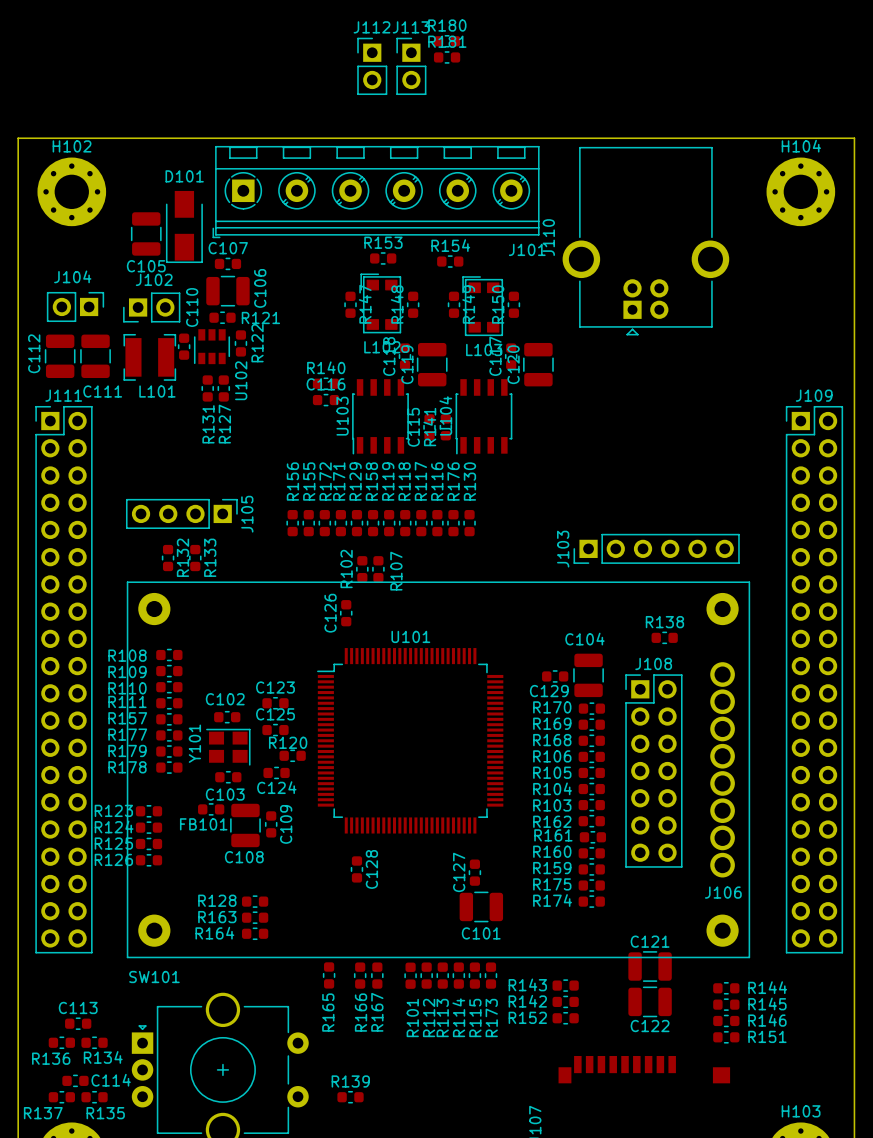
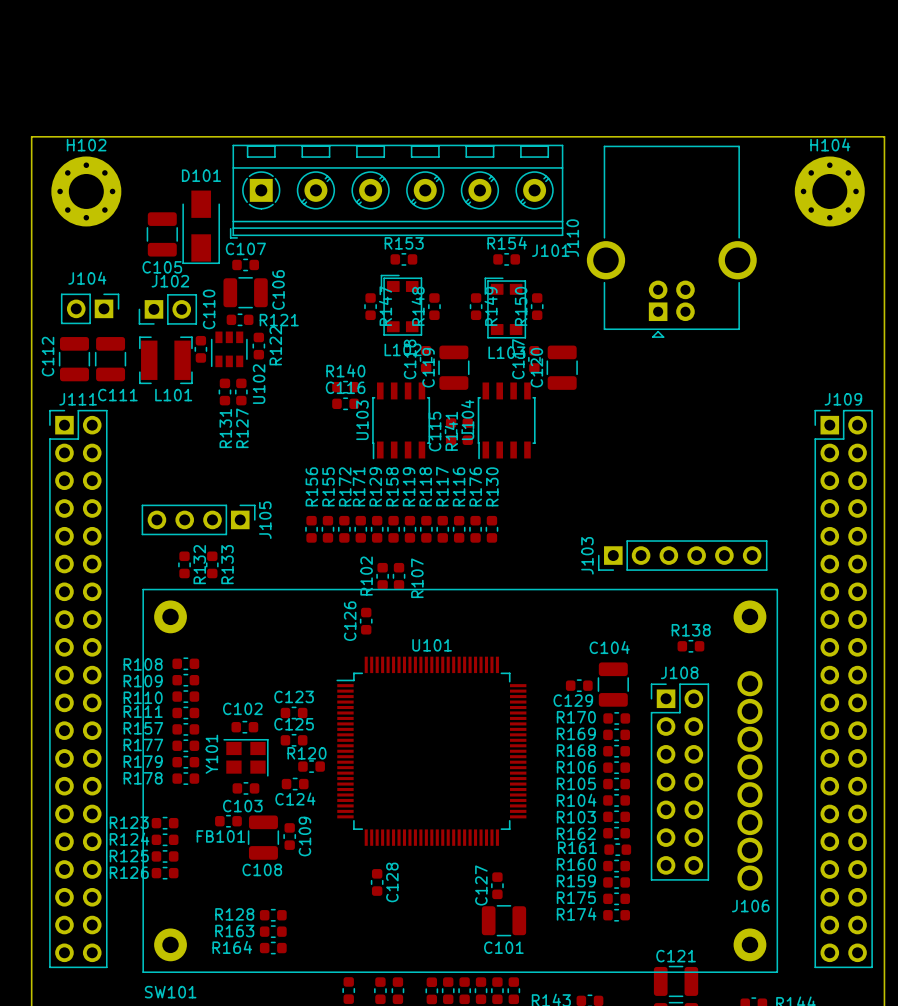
R180: (447, 41) -> none
R181: (447, 57) -> none
J112: (372, 66) -> none
J113: (411, 66) -> none
R154 position: (450, 261) -> (506, 259)

